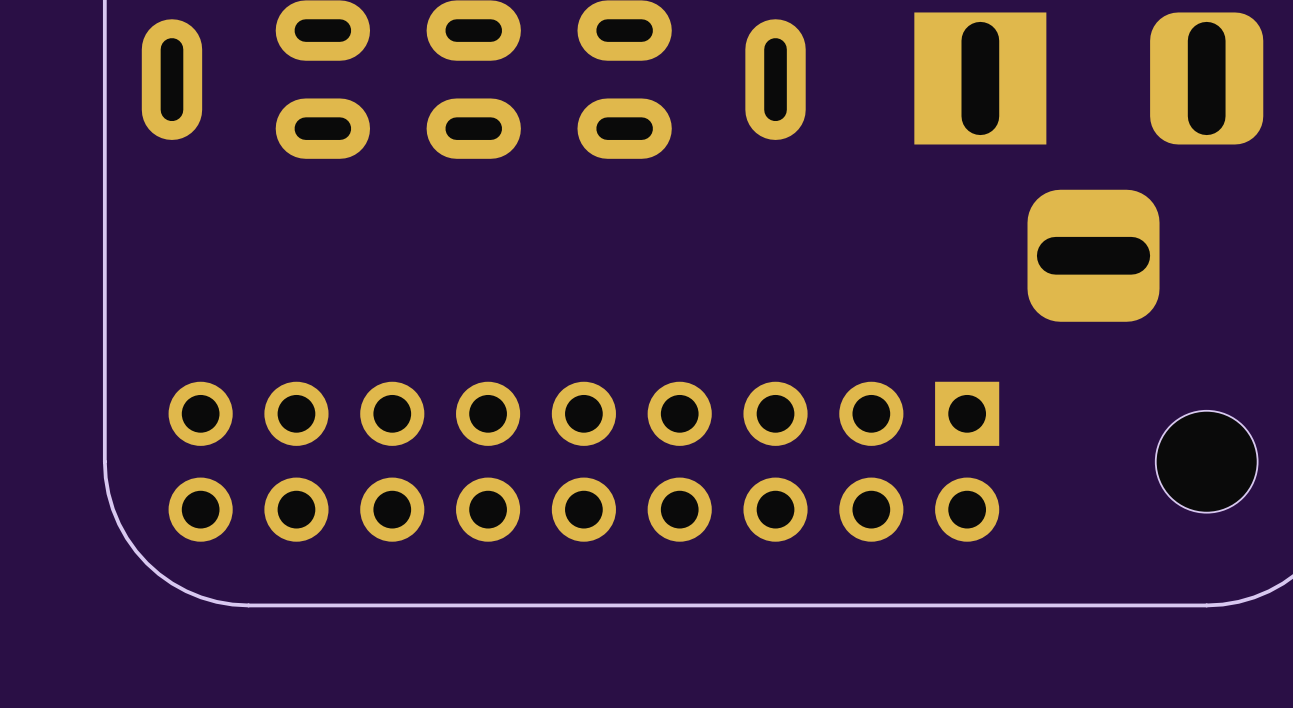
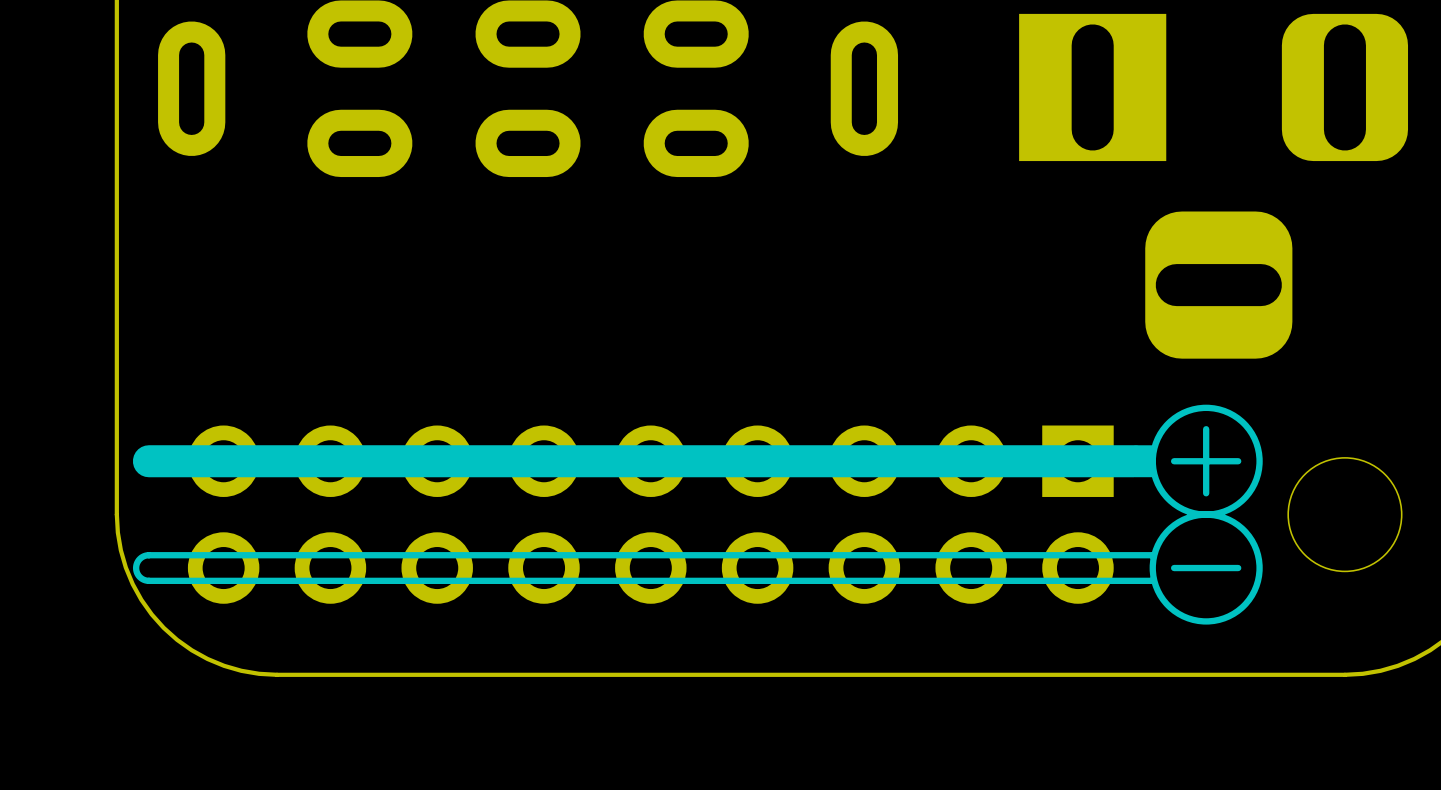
drawing: none -> [1132, 404, 1263, 625]
line: none -> (1206, 429) (1206, 493)
line: none -> (1133, 461) (148, 461)
line: none -> (1238, 461) (1174, 461)
line: none -> (1152, 555) (148, 555) (139, 558) (136, 568) (139, 577) (148, 580) (1152, 580)
line: none -> (1238, 568) (1174, 568)

